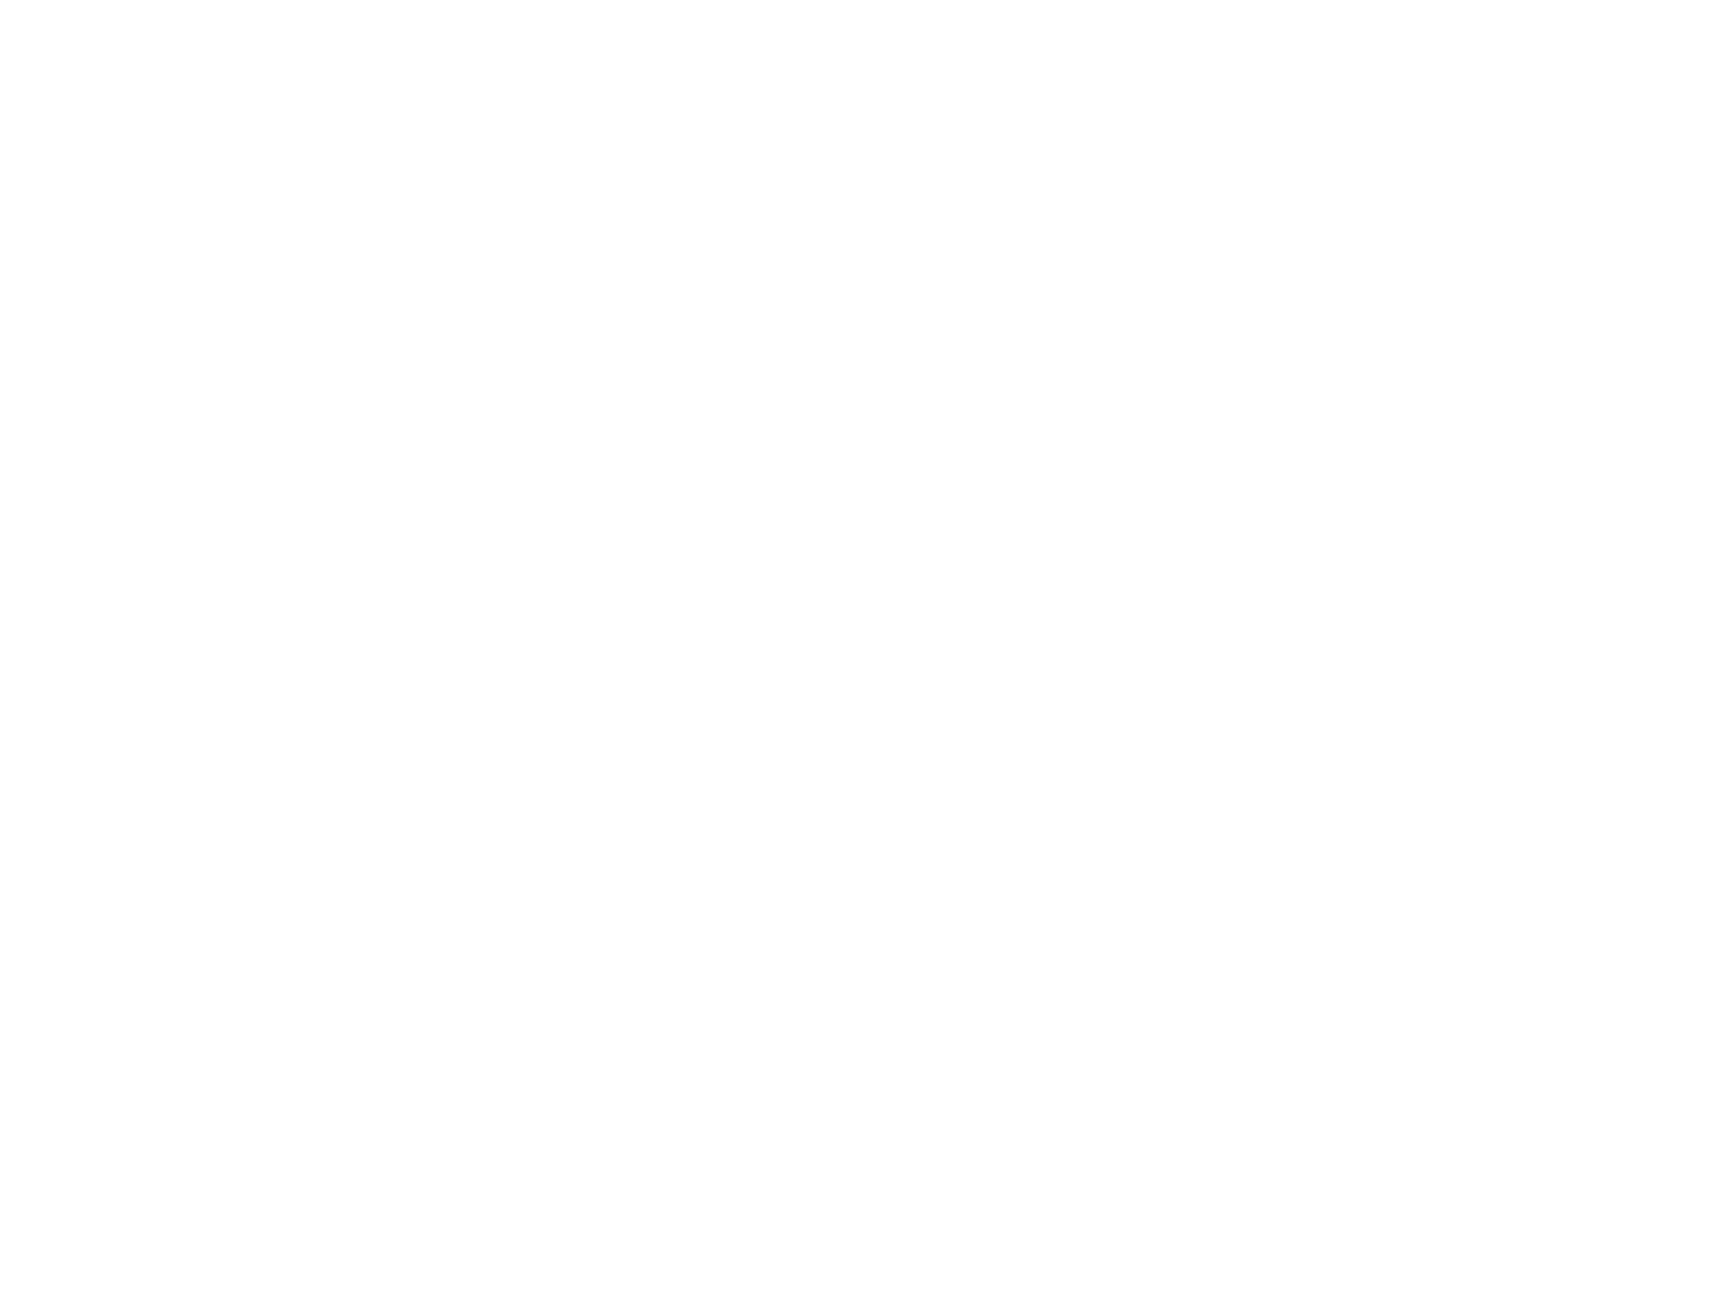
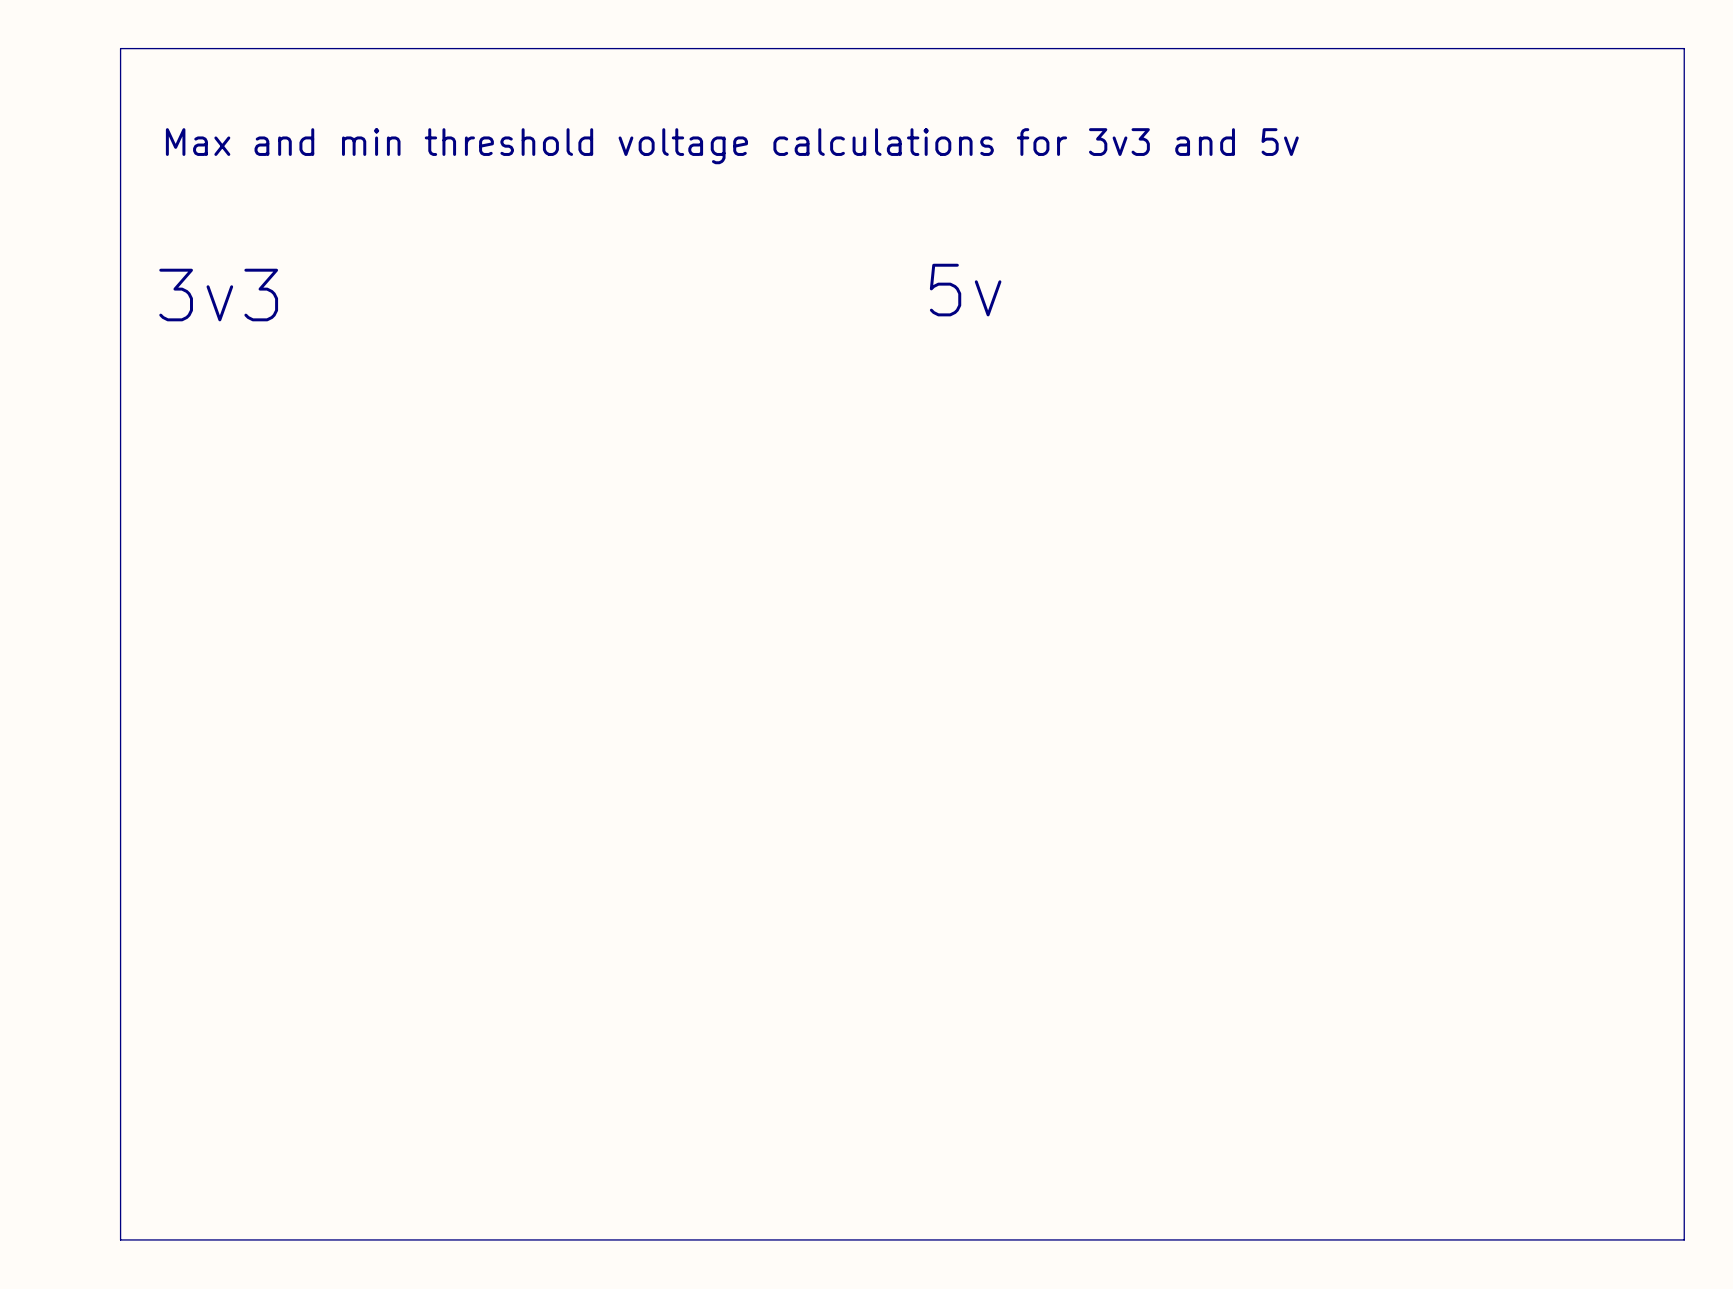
line: none -> (120, 48) (1684, 48) (1684, 1239) (120, 1239) (120, 48)
text: none -> Max and min threshold voltage calculations for 3v3 and 5v (732, 146)
text: none -> 5v (965, 290)
text: none -> 3v3 (218, 295)

